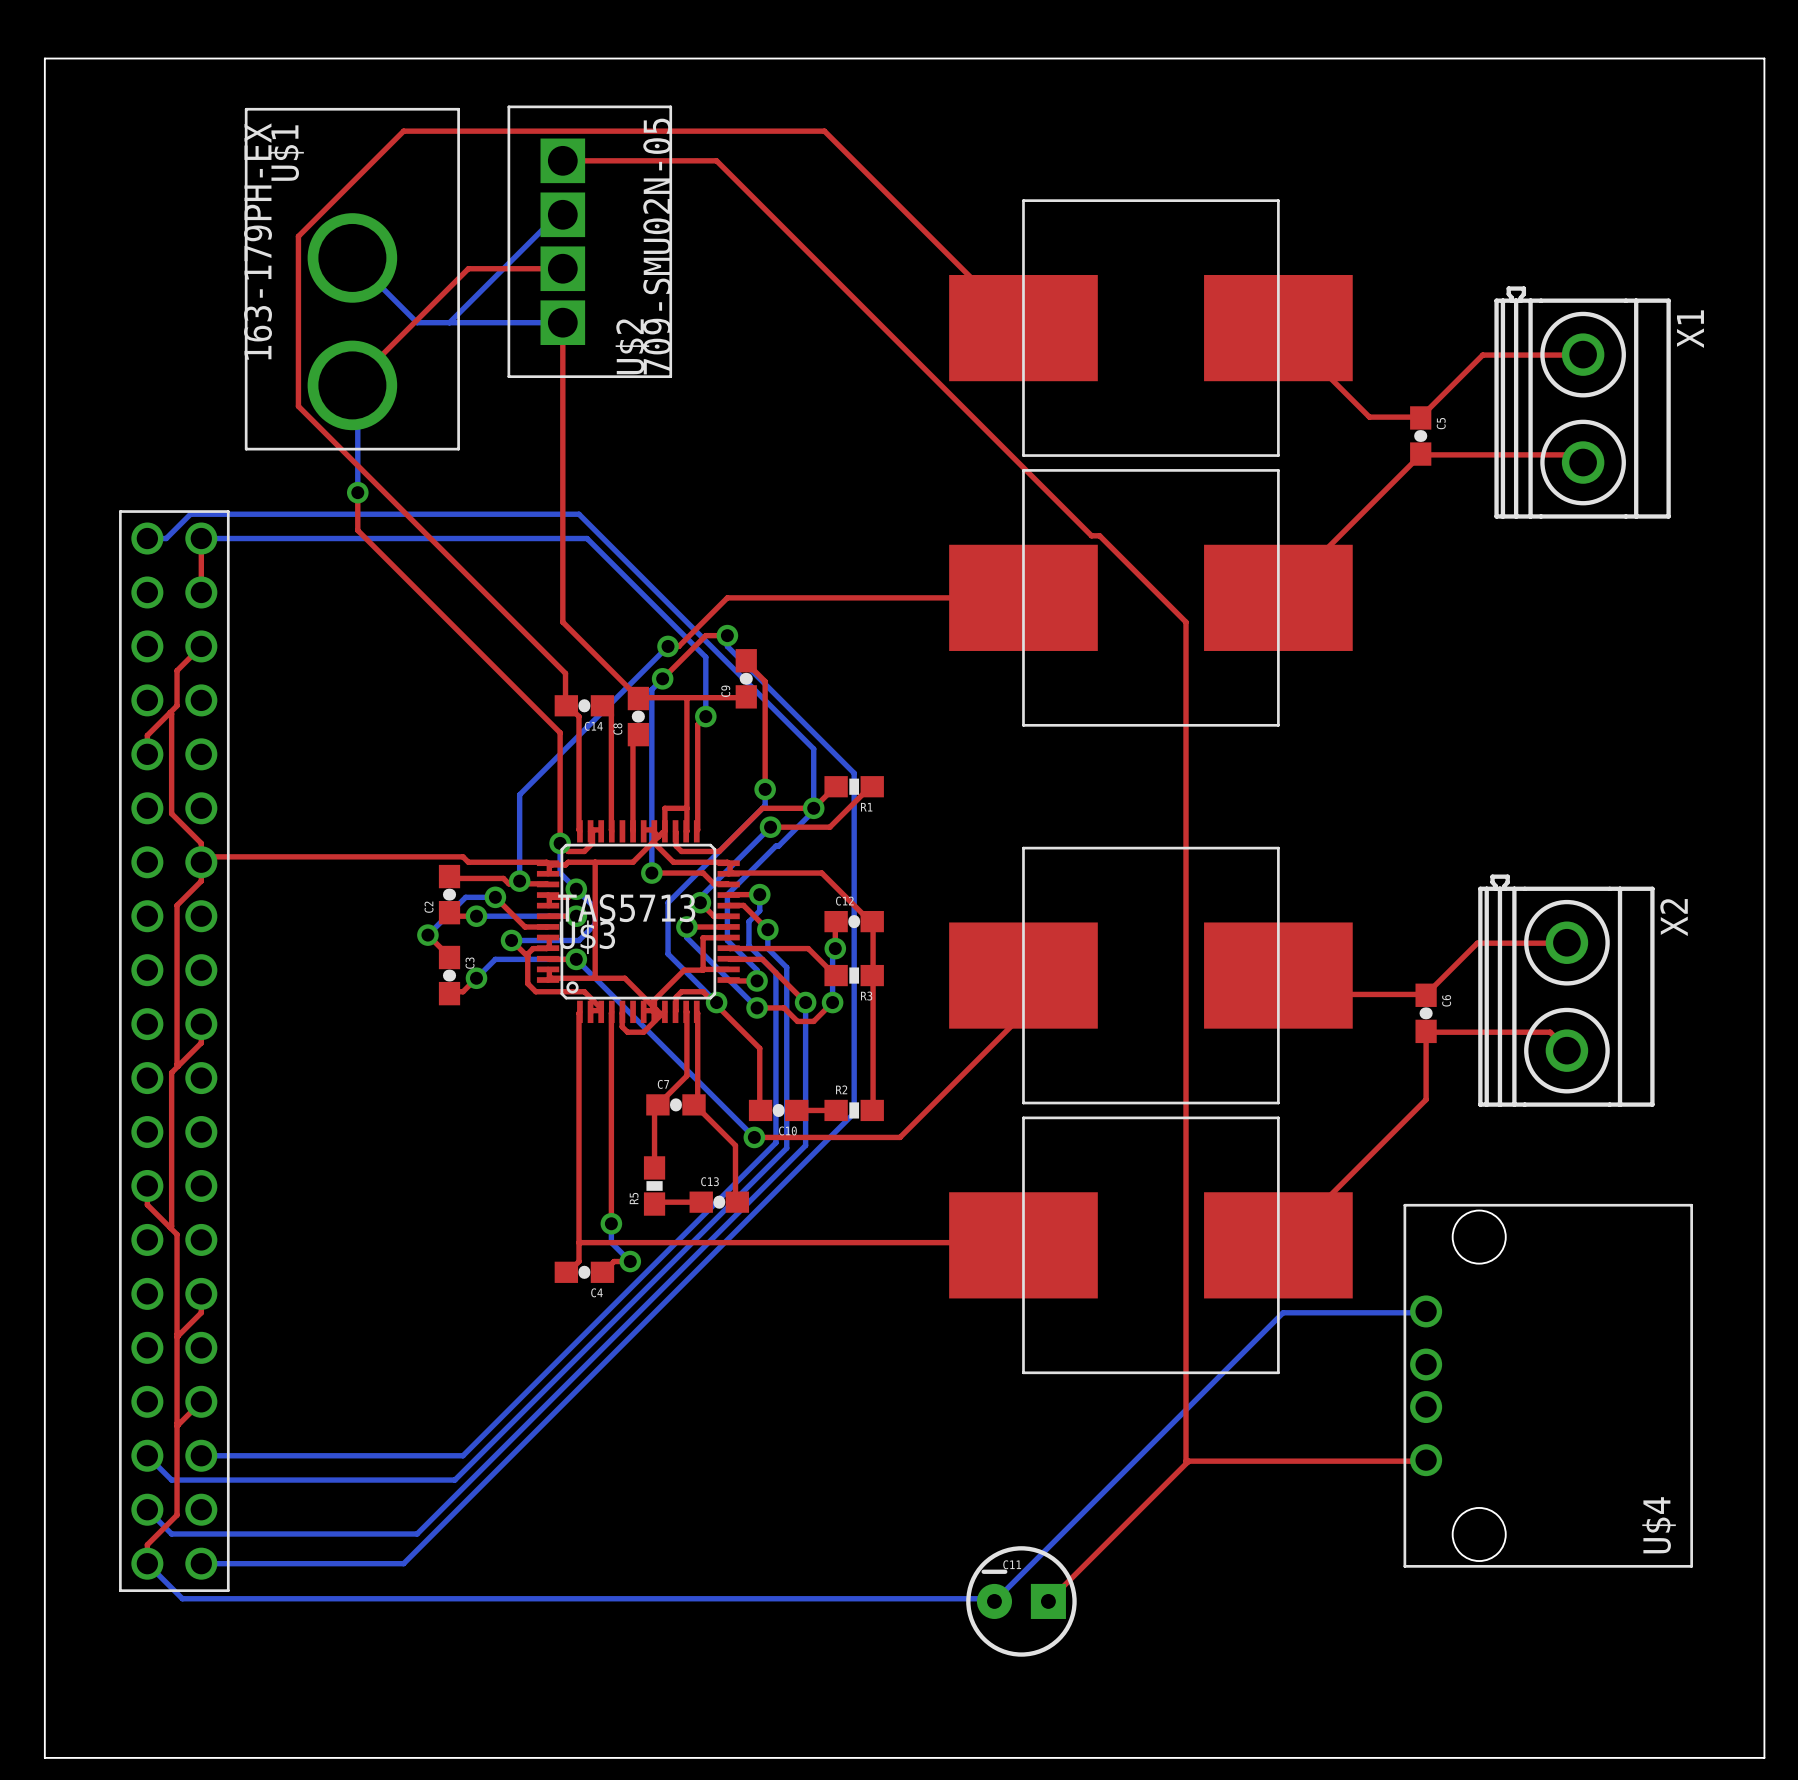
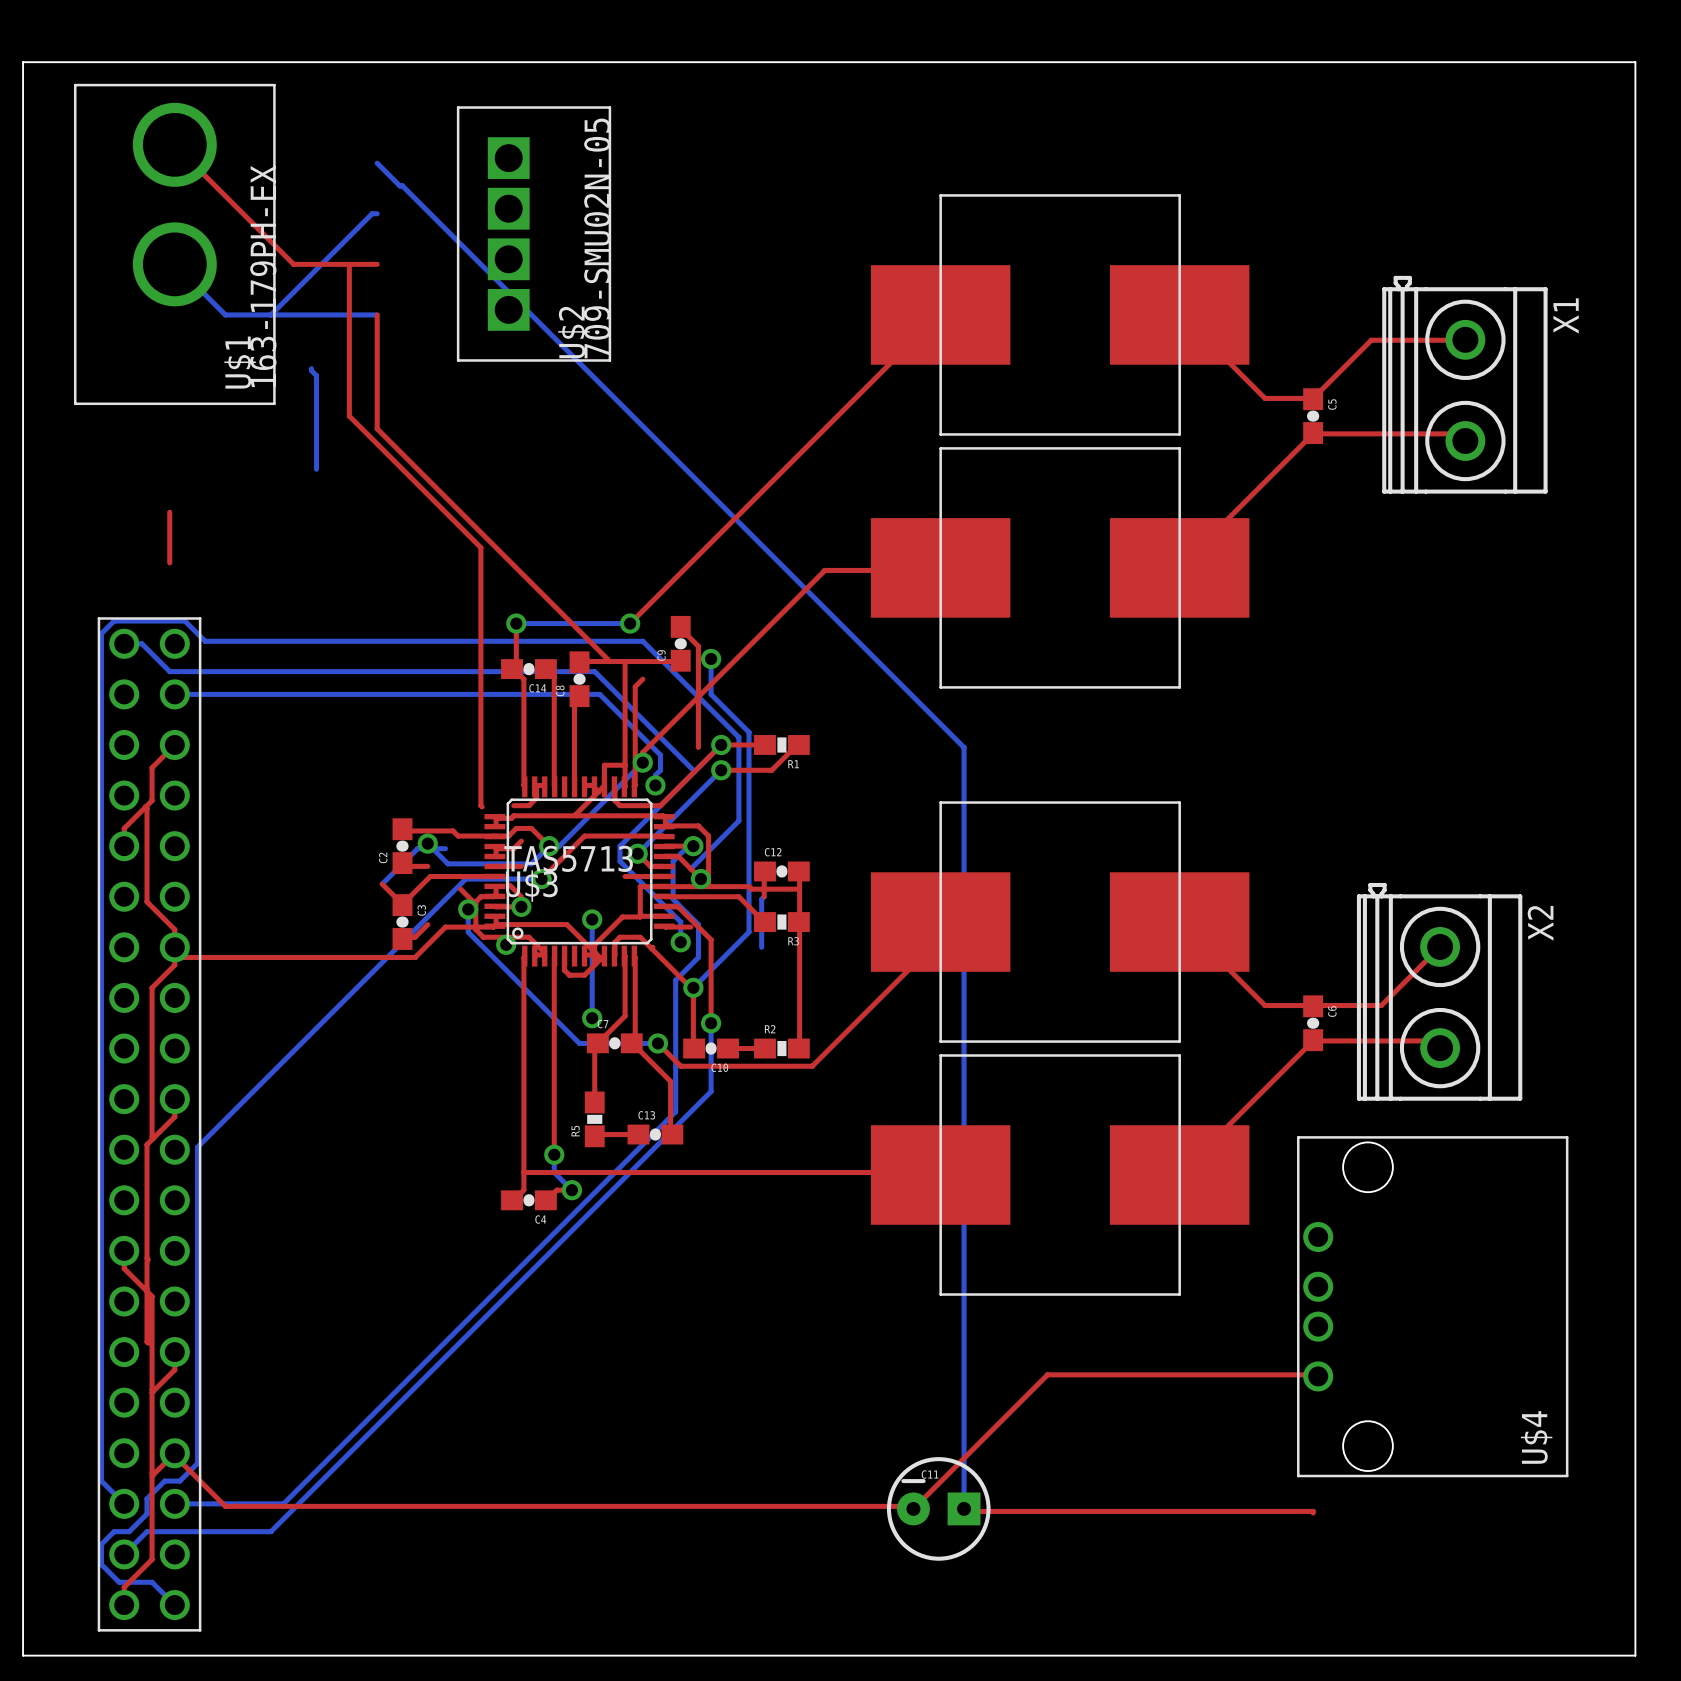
top track: none -> (174, 144) (293, 264) (377, 264)
top track: (562, 160) (716, 160) (1091, 535) (1099, 535) (1186, 622) (1187, 1462) -> none
bottom track: none -> (377, 163) (399, 185) (402, 185) (964, 747) (964, 1508)
bottom track: (562, 214) (557, 214) (449, 322) -> (377, 213) (372, 213) (270, 314)
bottom track: (352, 257) (417, 322) (562, 322) -> none
top track: (562, 268) (468, 268) (352, 385) -> none
bottom track: none -> (174, 264) (225, 314) (377, 314)
top track: none -> (349, 264) (349, 416) (480, 547) (482, 806)
U$1 rotation: 0° (352, 279) -> 180° (174, 244)
top track: (562, 322) (562, 622) (638, 697) -> none
top track: none -> (377, 314) (377, 428) (609, 661)
top track: (1021, 328) (824, 131) (403, 131) (298, 236) (298, 406) (565, 673) (566, 705) -> (938, 314) (630, 623)
top track: (357, 492) (357, 530) (560, 732) (560, 843) (568, 851) -> none
via: (357, 492) -> none
bottom track: (147, 538) (166, 538) (190, 514) (579, 514) (813, 748) (813, 810) (727, 894) (727, 940) (738, 951) -> (690, 843) (673, 861) (673, 899)
bottom track: (201, 538) (587, 538) (705, 657) (705, 716) -> none
top track: (989, 597) (727, 597) (678, 646) (668, 646) -> (908, 567) (905, 570) (824, 570) (642, 752) (642, 762)
top track: (727, 635) (705, 635) (662, 678) -> none
bottom track: (727, 635) (727, 646) (854, 773) (854, 1113) (403, 1563) (201, 1563) -> none
via: (727, 635) -> none
top track: (201, 646) (177, 670) (177, 705) (147, 735) (147, 754) -> (174, 744) (152, 767) (152, 800) (124, 828) (124, 846)
bottom track: (668, 646) (519, 794) (519, 881) -> none
via: (668, 646) -> none
top track: none -> (516, 623) (516, 669) (513, 669)
bottom track: none -> (516, 623) (630, 623)
via: none -> (516, 623)
via: none -> (630, 623)
bottom track: none -> (124, 643) (141, 643) (169, 671) (594, 671) (694, 771)
bottom track: (662, 678) (651, 689) (651, 873) -> none
via: (662, 678) -> none
bottom track: none -> (711, 658) (711, 694) (749, 732) (749, 932) (693, 987)
via: none -> (711, 658)
top track: (170, 712) (171, 813) (201, 843) (201, 881) (177, 905) -> (145, 806) (147, 856)
via: (705, 716) -> none
bottom track: none -> (174, 694) (599, 694) (660, 755) (660, 770) (655, 775) (655, 785)
bottom track: none -> (721, 744) (620, 846) (620, 861) (680, 922) (680, 942)
via: none -> (721, 744)
top track: (835, 786) (813, 808) (762, 808) (719, 851) -> (764, 744) (721, 744) (660, 805) (655, 805)
bottom track: (765, 789) (765, 805) (668, 902) (668, 953) (716, 1002) -> none
via: (765, 789) -> none
bottom track: none -> (642, 762) (559, 846) (549, 846) (531, 863) (448, 863) (427, 843)
via: none -> (642, 762)
via: (813, 808) -> none
via: none -> (721, 770)
top track: (843, 813) (829, 827) (770, 827) -> (771, 770) (721, 770)
bottom track: (770, 827) (700, 897) (700, 902) -> (721, 770) (637, 853)
via: (770, 827) -> none
via: none -> (655, 785)
top track: (653, 842) (673, 862) -> (575, 814) (612, 815)
bottom track: (560, 843) (560, 873) (595, 908) (595, 924) (579, 940) (511, 940) -> none
via: (560, 843) -> none
top track: (201, 856) (463, 856) (468, 862) (548, 863) -> none
top track: (595, 862) (595, 978) -> none
top track: (651, 873) (703, 873) (713, 883) -> (541, 879) (584, 836) (650, 836)
via: (651, 873) -> none
top track: (765, 873) (821, 873) (872, 921) -> (698, 825) (708, 836) (708, 886)
via: (519, 881) -> none
top track: none -> (494, 836) (508, 836) (516, 828) (531, 828) (549, 846)
via: (576, 889) -> none
via: none -> (549, 846)
bottom track: (759, 894) (759, 910) (748, 921) (748, 945) (775, 972) (775, 1142) (740, 1177) -> (690, 916) (698, 924) (698, 957) (675, 980) (675, 1111)
top track: (495, 897) (525, 927) -> (402, 904) (430, 876) (473, 876)
via position: (495, 897) -> (427, 843)
bottom track: (476, 916) (576, 916) -> none
via: (476, 916) -> none
via: (576, 916) -> none
bottom track: none -> (690, 868) (738, 820) (738, 737) (642, 641) (205, 641) (184, 621) (114, 621) (101, 633) (101, 1481) (124, 1503)
bottom track: (686, 927) (686, 937) (757, 1007) -> none
via: (686, 927) -> none
bottom track: none -> (541, 879) (465, 879) (197, 1147) (197, 1463) (179, 1481) (164, 1481) (147, 1498) (147, 1513) (129, 1531) (114, 1531) (101, 1544) (101, 1564) (119, 1582) (152, 1582) (174, 1605)
via: none -> (541, 879)
bottom track: (767, 929) (767, 948) (786, 967) (786, 1148) (778, 1156) -> (711, 1023) (711, 1091)
via: (427, 935) -> none
top track: none -> (509, 885) (521, 896)
top track: none -> (664, 886) (799, 889)
via: (511, 940) -> none
top track: (1566, 942) (1477, 943) (1426, 994) -> none
via: (835, 948) -> none
top track: (177, 953) (178, 1065) -> (147, 901) (174, 929) (174, 965) (152, 987) (153, 1138)
top track: (743, 959) (762, 959) (805, 1002) -> (678, 906) (711, 939) (711, 1023)
bottom track: none -> (468, 909) (468, 932) (579, 1043) (657, 1043)
via: none -> (468, 909)
bottom track: none -> (592, 919) (592, 1018)
via: none -> (592, 919)
bottom track: (476, 978) (495, 959) (576, 959) (754, 1137) -> none
via: (476, 978) -> none
top track: none -> (494, 926) (445, 927) (415, 957) (174, 957)
via: (757, 980) -> none
X2 position: (1566, 990) -> (1439, 991)
top track: (1021, 994) (1021, 1016) (900, 1137) (754, 1137) -> (938, 939) (812, 1066) (680, 1066) (657, 1043)
top track: (1299, 994) (1426, 994) -> (1199, 939) (1265, 1005) (1381, 1005) (1440, 946)
via: none -> (680, 942)
via: none -> (506, 944)
via: (716, 1002) -> none
bottom track: (805, 1002) (805, 1145) (417, 1534) (171, 1534) (147, 1509) -> none
via: (805, 1002) -> none
top track: (832, 1002) (813, 1021) (797, 1021) (784, 1007) (757, 1007) -> none
via: (832, 1002) -> none
via: (757, 1007) -> none
C6 position: (1426, 1013) -> (1313, 1023)
top track: (201, 1024) (201, 1043) (171, 1072) (170, 1227) -> none
top track: (1426, 1031) (1426, 1099) (1278, 1245) -> (1440, 1048) (1434, 1040) (1313, 1040) (1179, 1175)
top track: (1426, 1032) (1550, 1032) (1566, 1050) -> none
via: none -> (693, 987)
part position: (174, 1051) -> (149, 1124)
via: none -> (592, 1018)
via: none -> (711, 1023)
via: none -> (657, 1043)
via: (754, 1137) -> none
top track: (147, 1185) (147, 1204) (177, 1234) -> (174, 1099) (174, 1116) (147, 1144) (147, 1164)
top track: (201, 1293) (201, 1312) (177, 1337) -> none
bottom track: (1426, 1311) (1283, 1312) (994, 1601) (994, 1598) (182, 1598) (147, 1563) -> none
top track: none -> (124, 1250) (124, 1268) (152, 1296) (153, 1391)
top track: (201, 1401) (177, 1426) (177, 1515) (147, 1544) (147, 1563) -> none
top track: none -> (174, 1352) (174, 1369) (152, 1392) (153, 1474)
bottom track: (147, 1455) (171, 1480) (454, 1480) -> (124, 1554) (147, 1531) (270, 1531) (407, 1395)
bottom track: (201, 1455) (463, 1455) -> (174, 1503) (283, 1503) (415, 1372)
top track: none -> (1313, 1373) (1047, 1374) (913, 1508) (913, 1506) (225, 1506) (174, 1455) (174, 1453) (152, 1476) (152, 1559) (124, 1587) (124, 1605)
top track: (1426, 1460) (1188, 1461) (1048, 1601) -> (1313, 1513) (1313, 1511) (966, 1511) (964, 1508)

